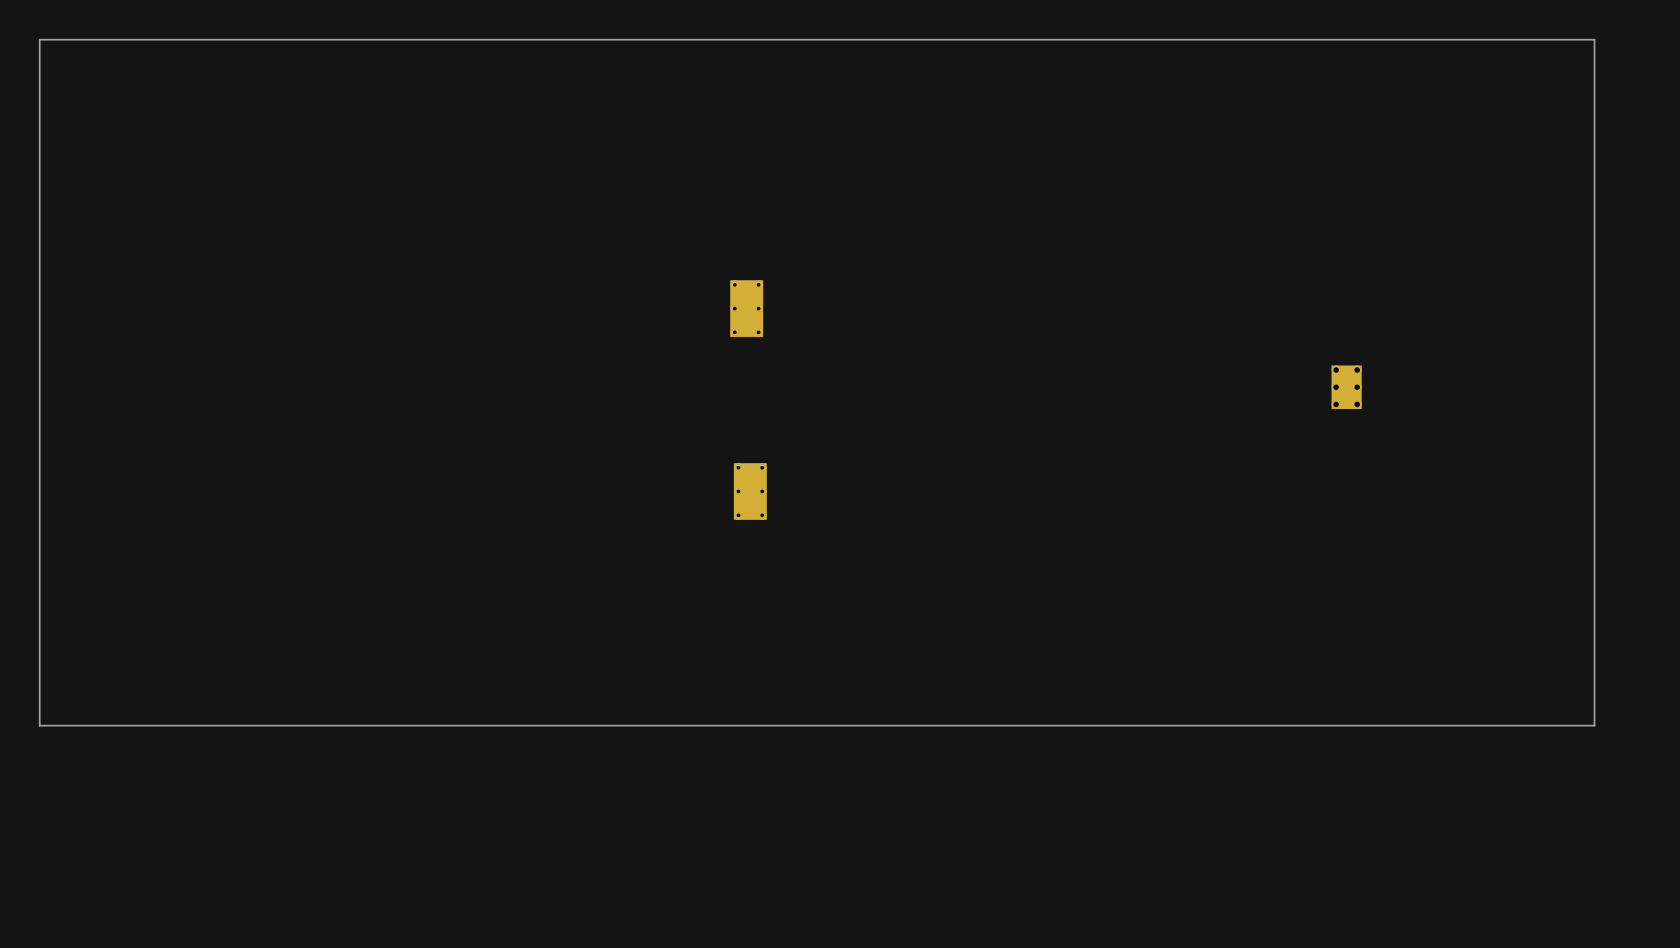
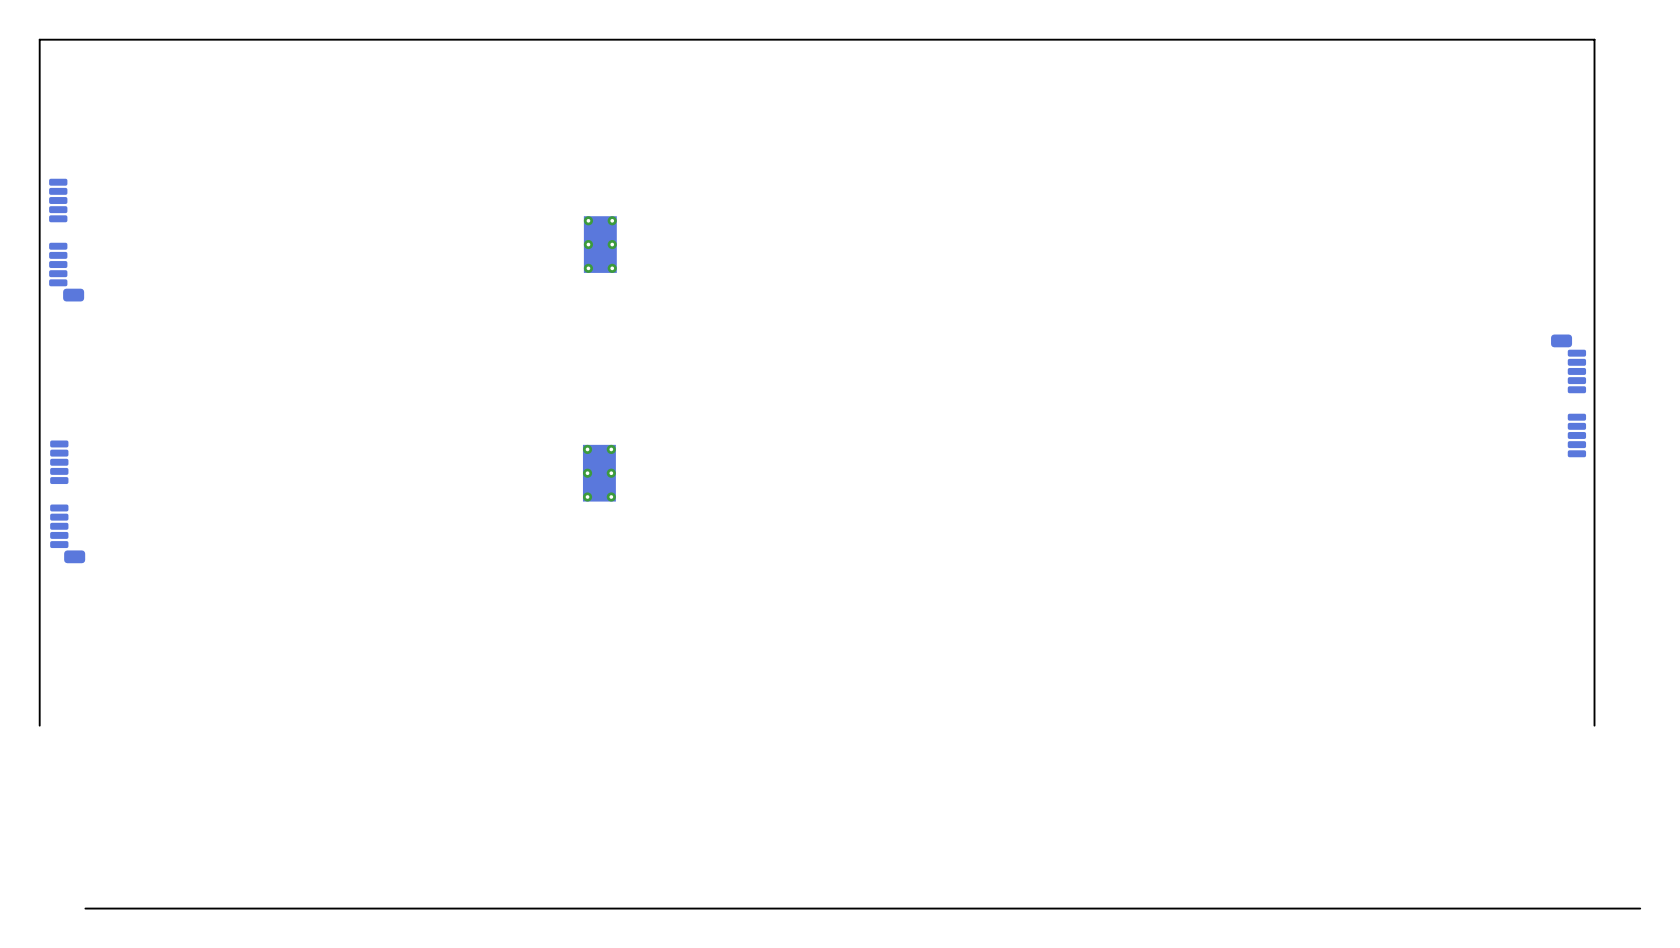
part: none -> (66, 240)
part: none -> (600, 244)
part: (746, 308) -> none
part: (1346, 387) -> none
part: none -> (1568, 395)
part: none -> (599, 473)
part: (750, 491) -> none
part: none -> (67, 501)
board edge: (1594, 725) (39, 725) -> (1640, 908) (85, 908)

